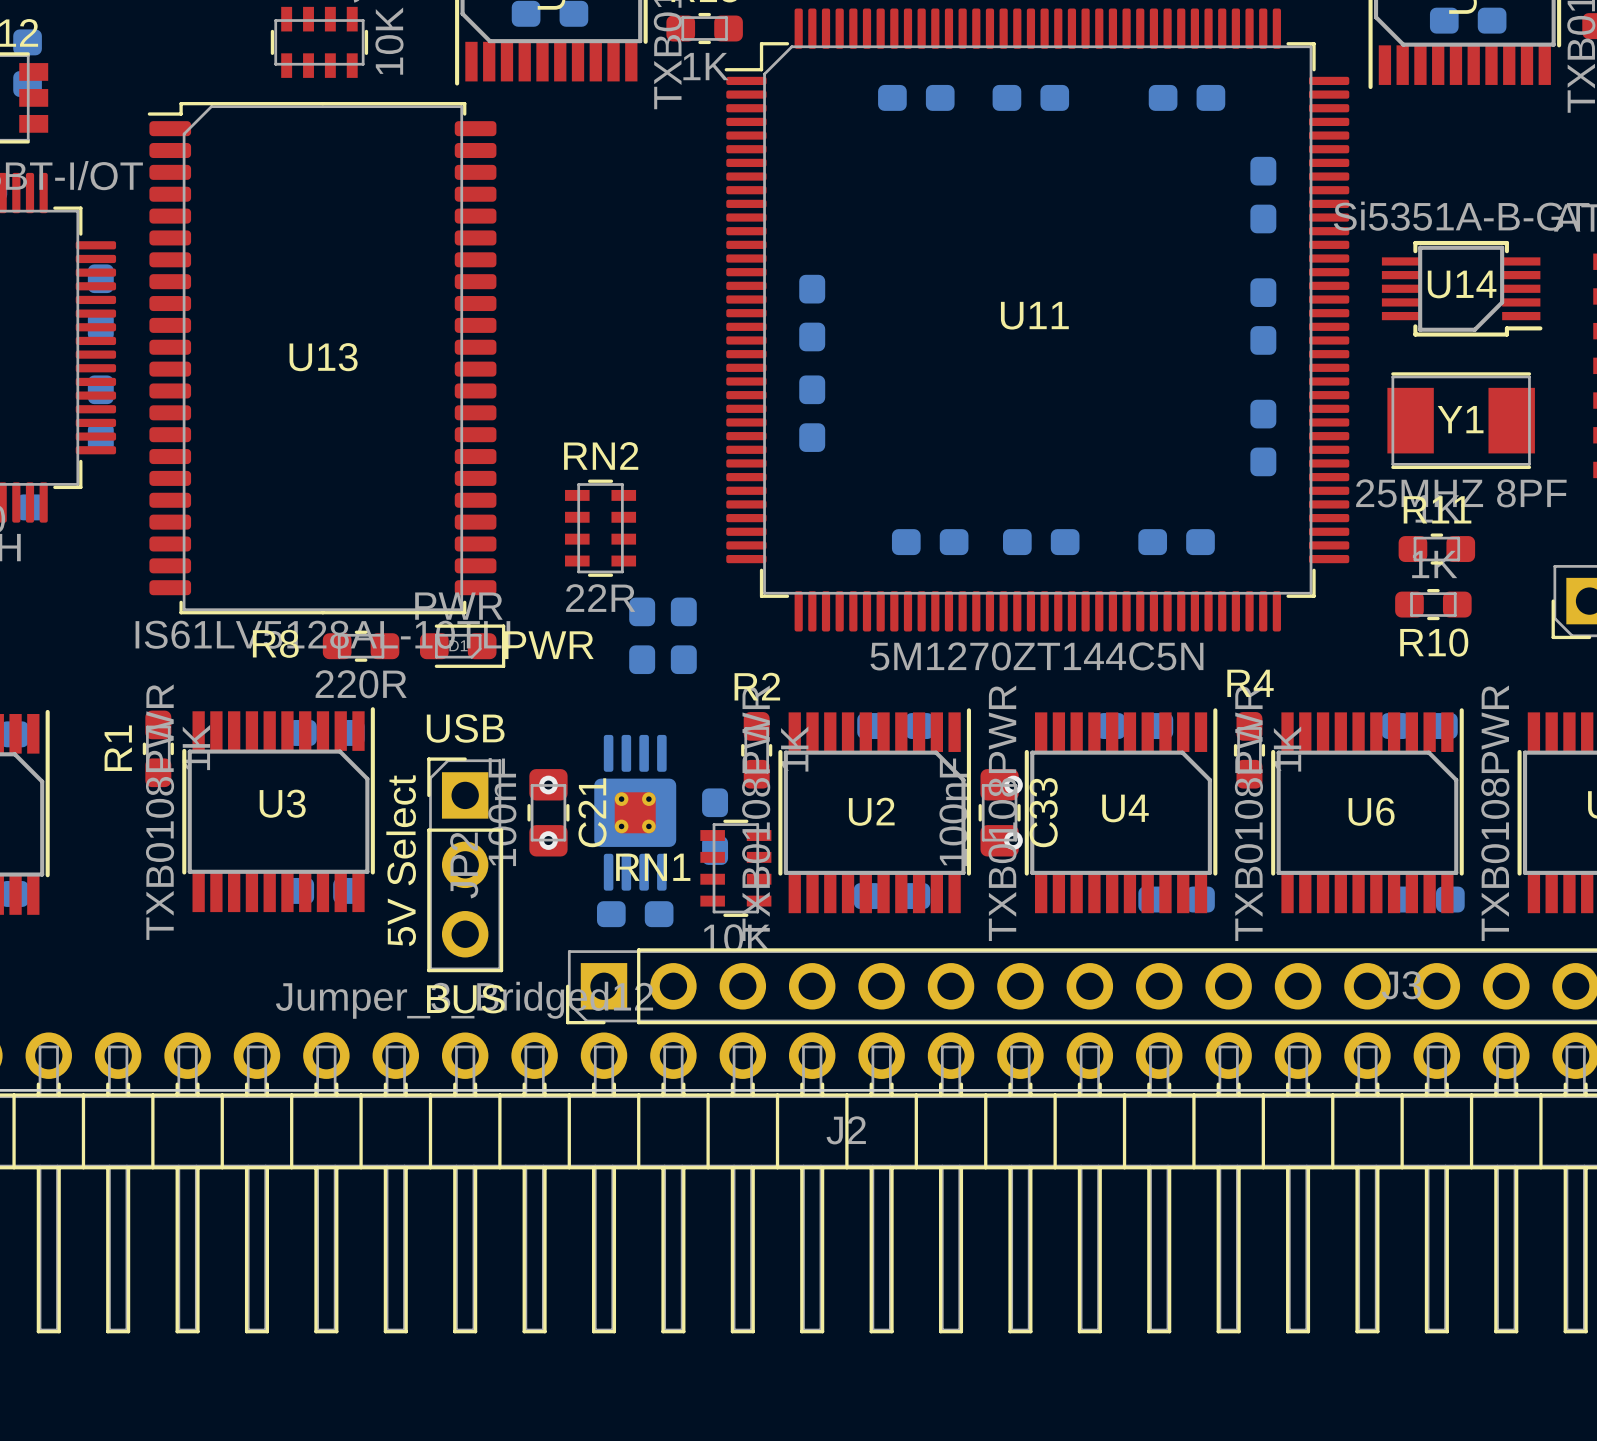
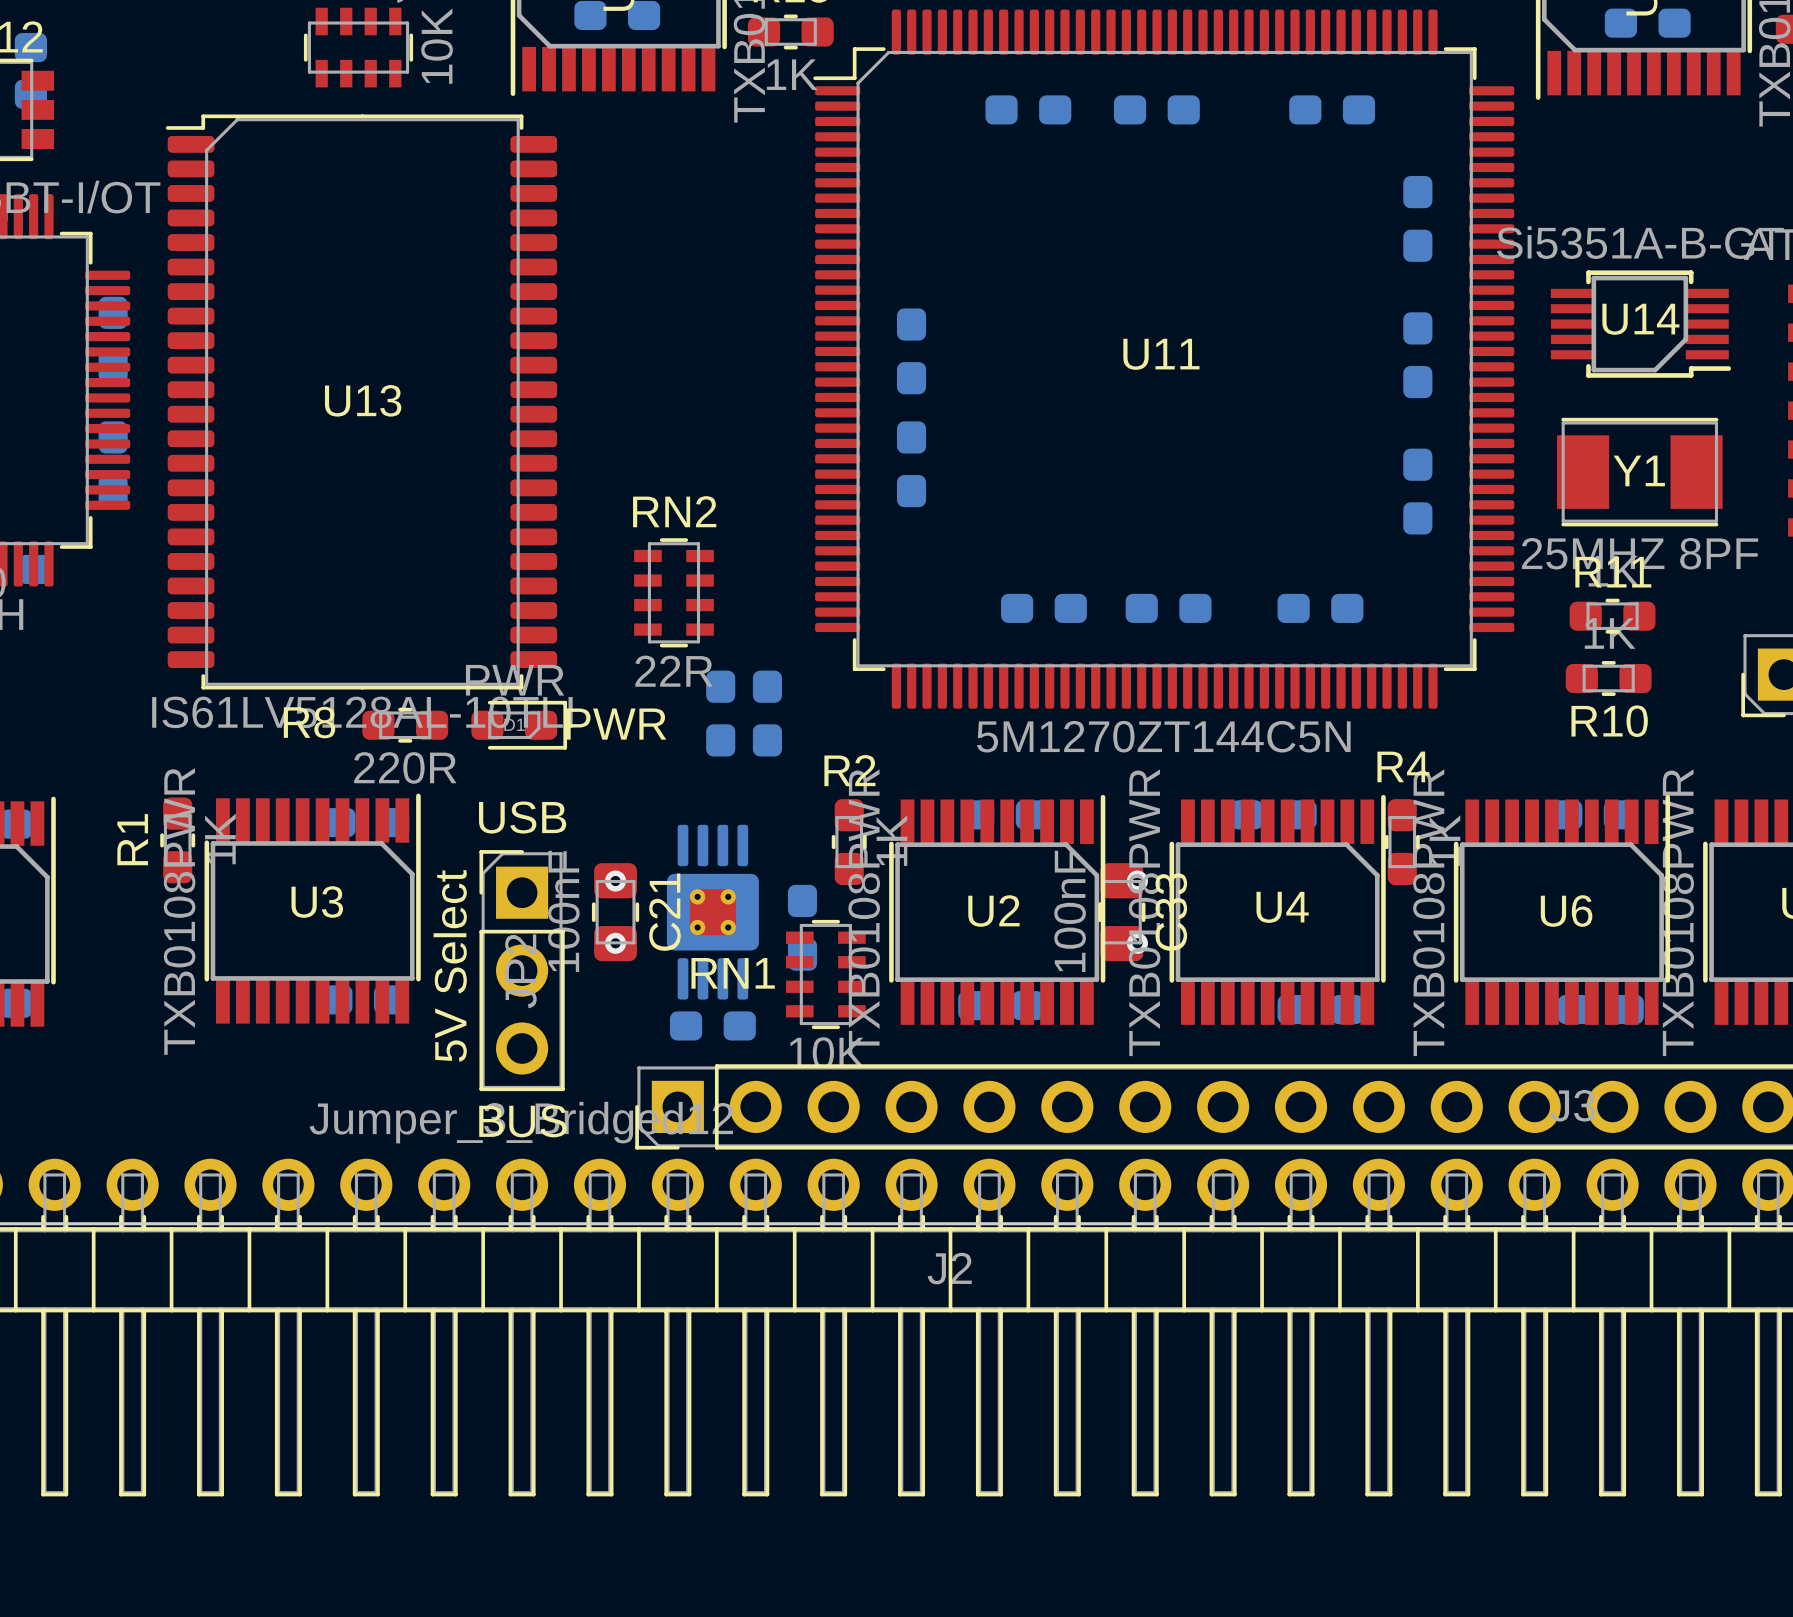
U2 position: (874, 810) -> (997, 909)
U4 position: (1121, 810) -> (1277, 909)
U6 position: (1367, 810) -> (1561, 909)

